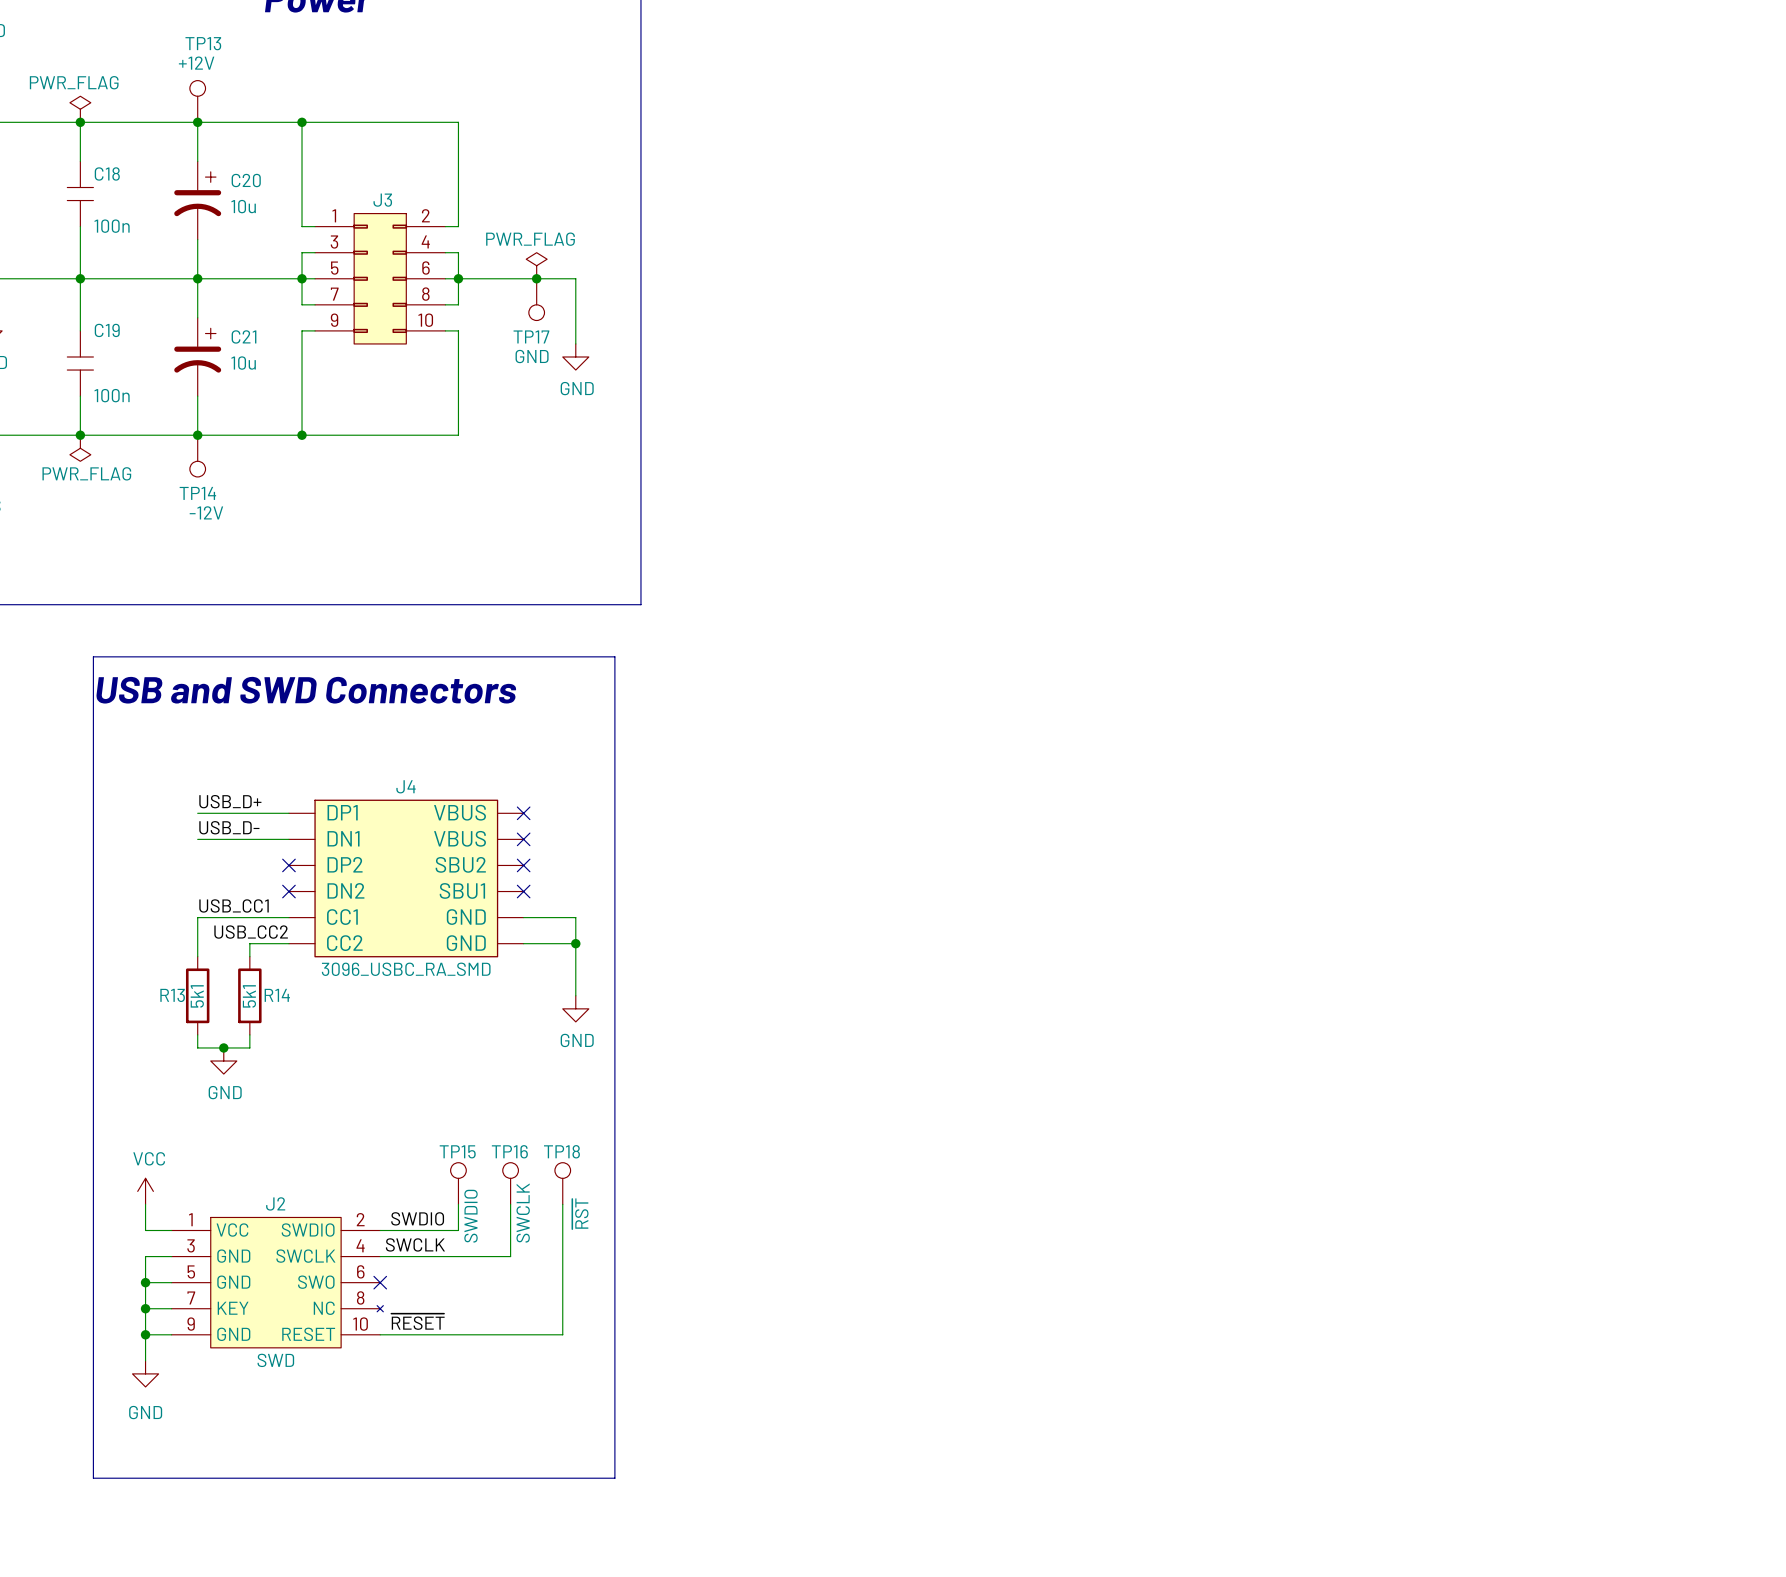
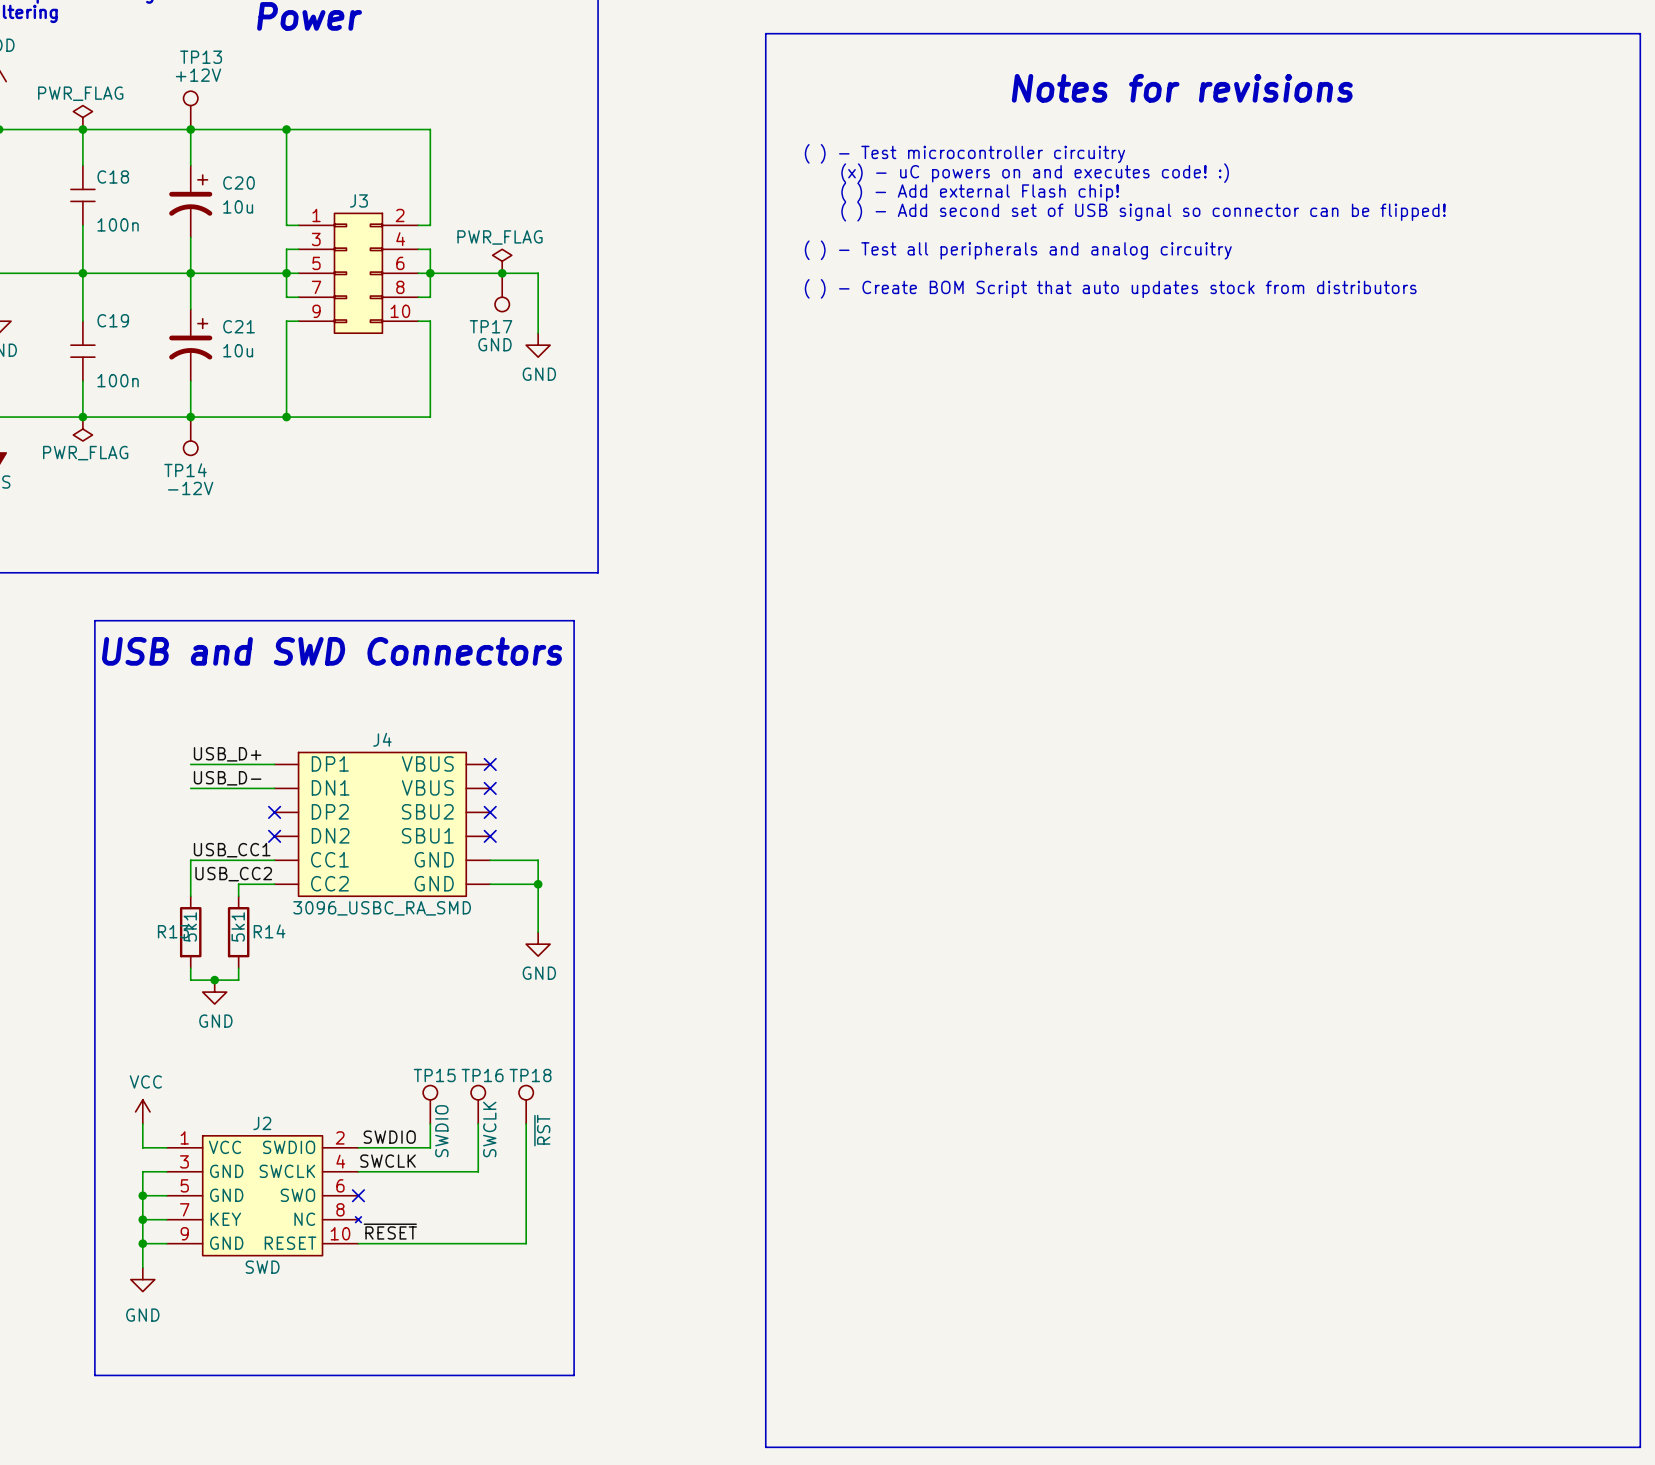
line: none -> (765, 33) (1640, 33) (1640, 1447) (765, 1447) (765, 33)
text: none -> Notes for revisions (1182, 88)
text: none -> ( ) - Test microcontroller circuitry (964, 153)
text: none -> (x) - uC powers on and executes code! :) (1035, 173)
text: none -> ( ) - Add external Flash chip! (980, 192)
text: none -> ( ) - Add second set of USB signal so connector can be flipped! (1143, 211)
text: none -> ( ) - Test all peripherals and analog circuitry (1018, 250)
text: none -> ( ) - Create BOM Script that auto updates stock from distributors (1110, 288)

